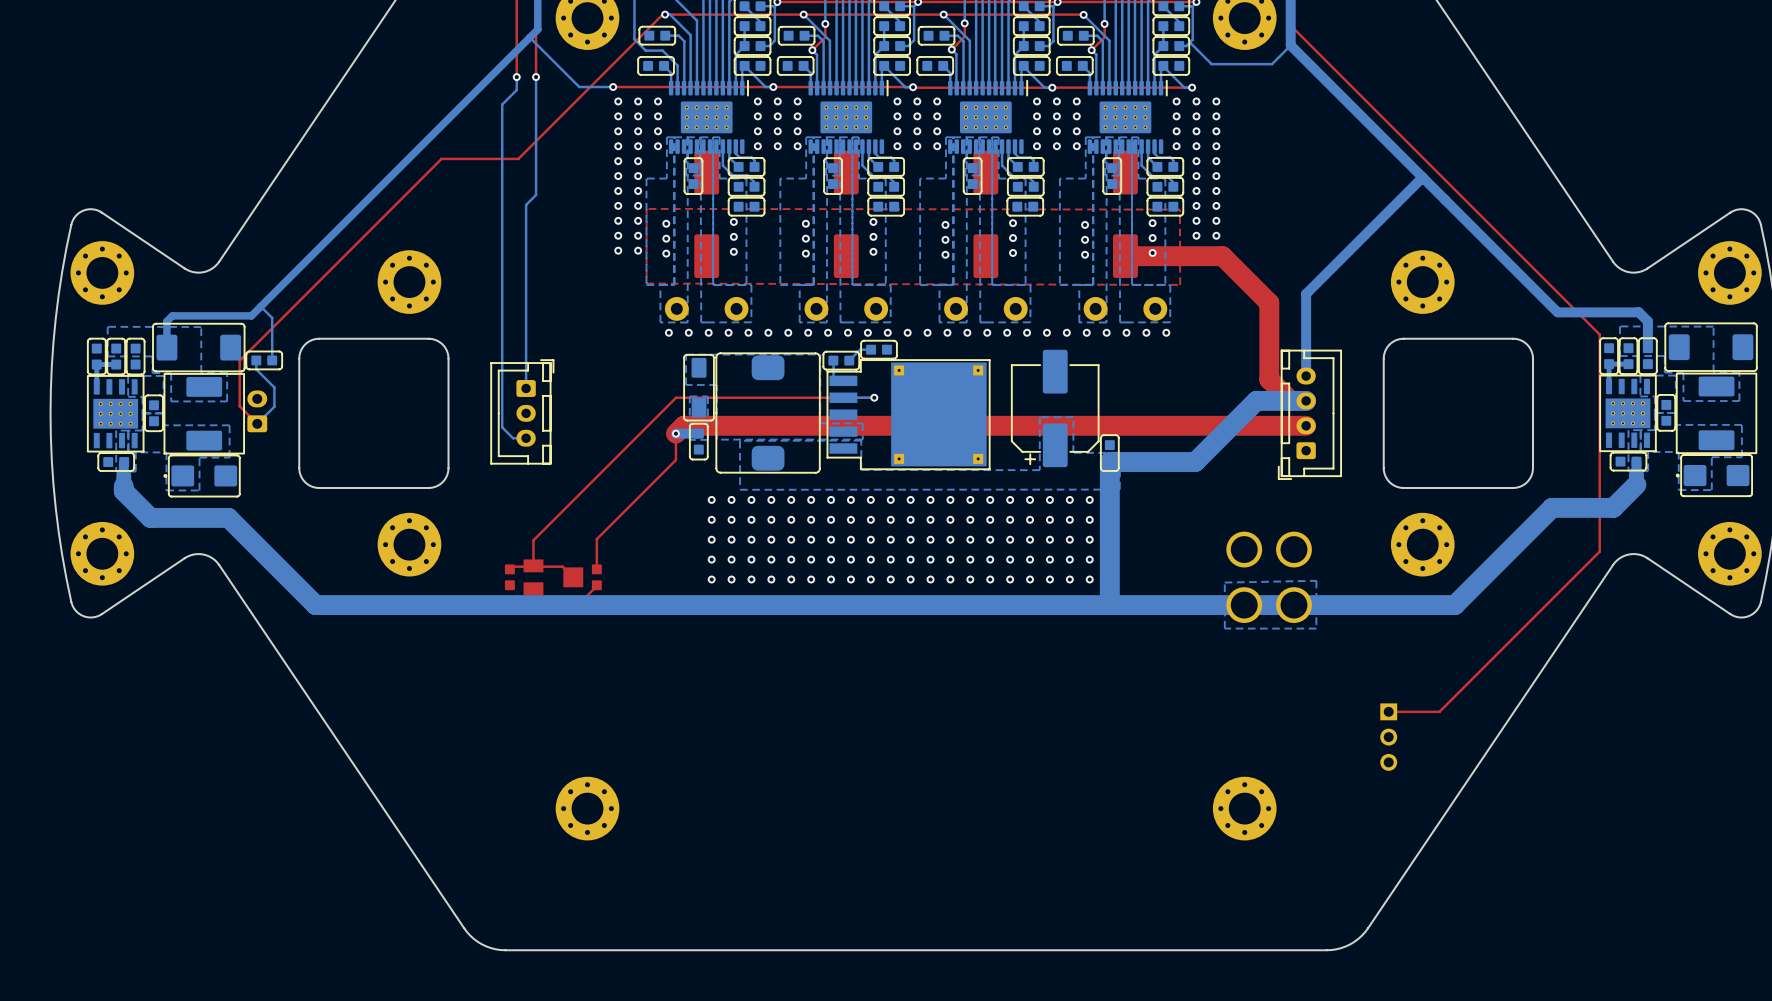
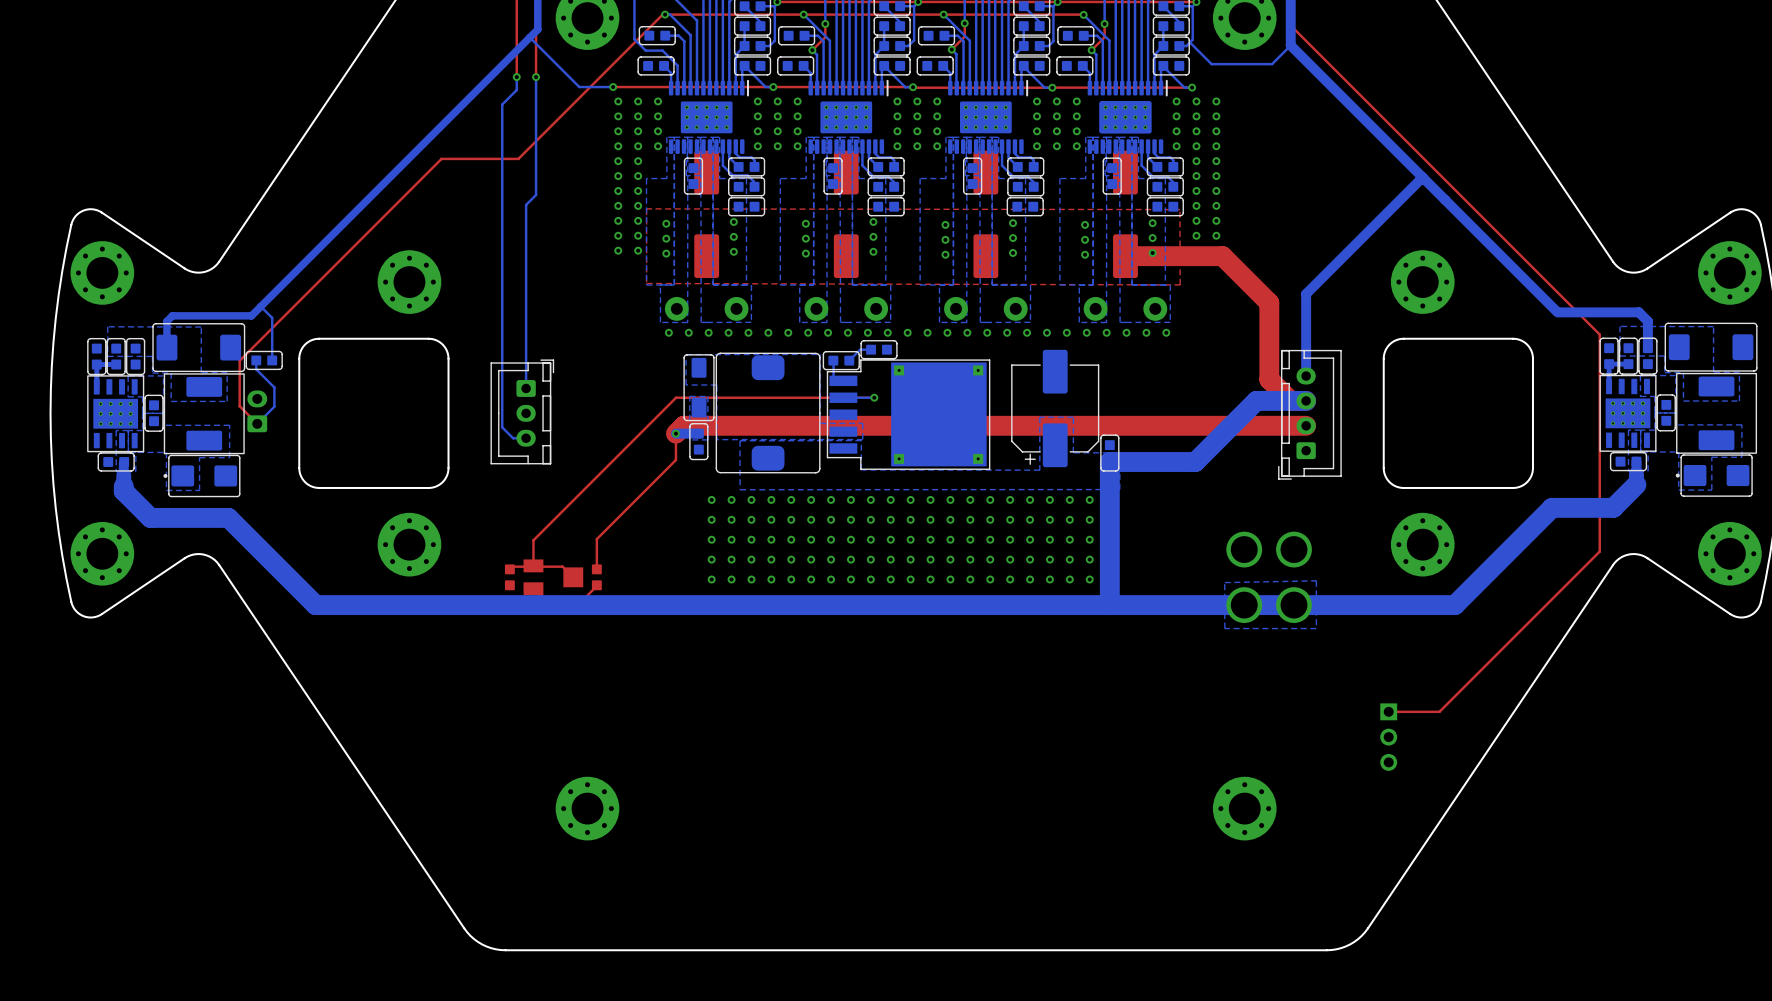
part: none -> (1125, 117)

